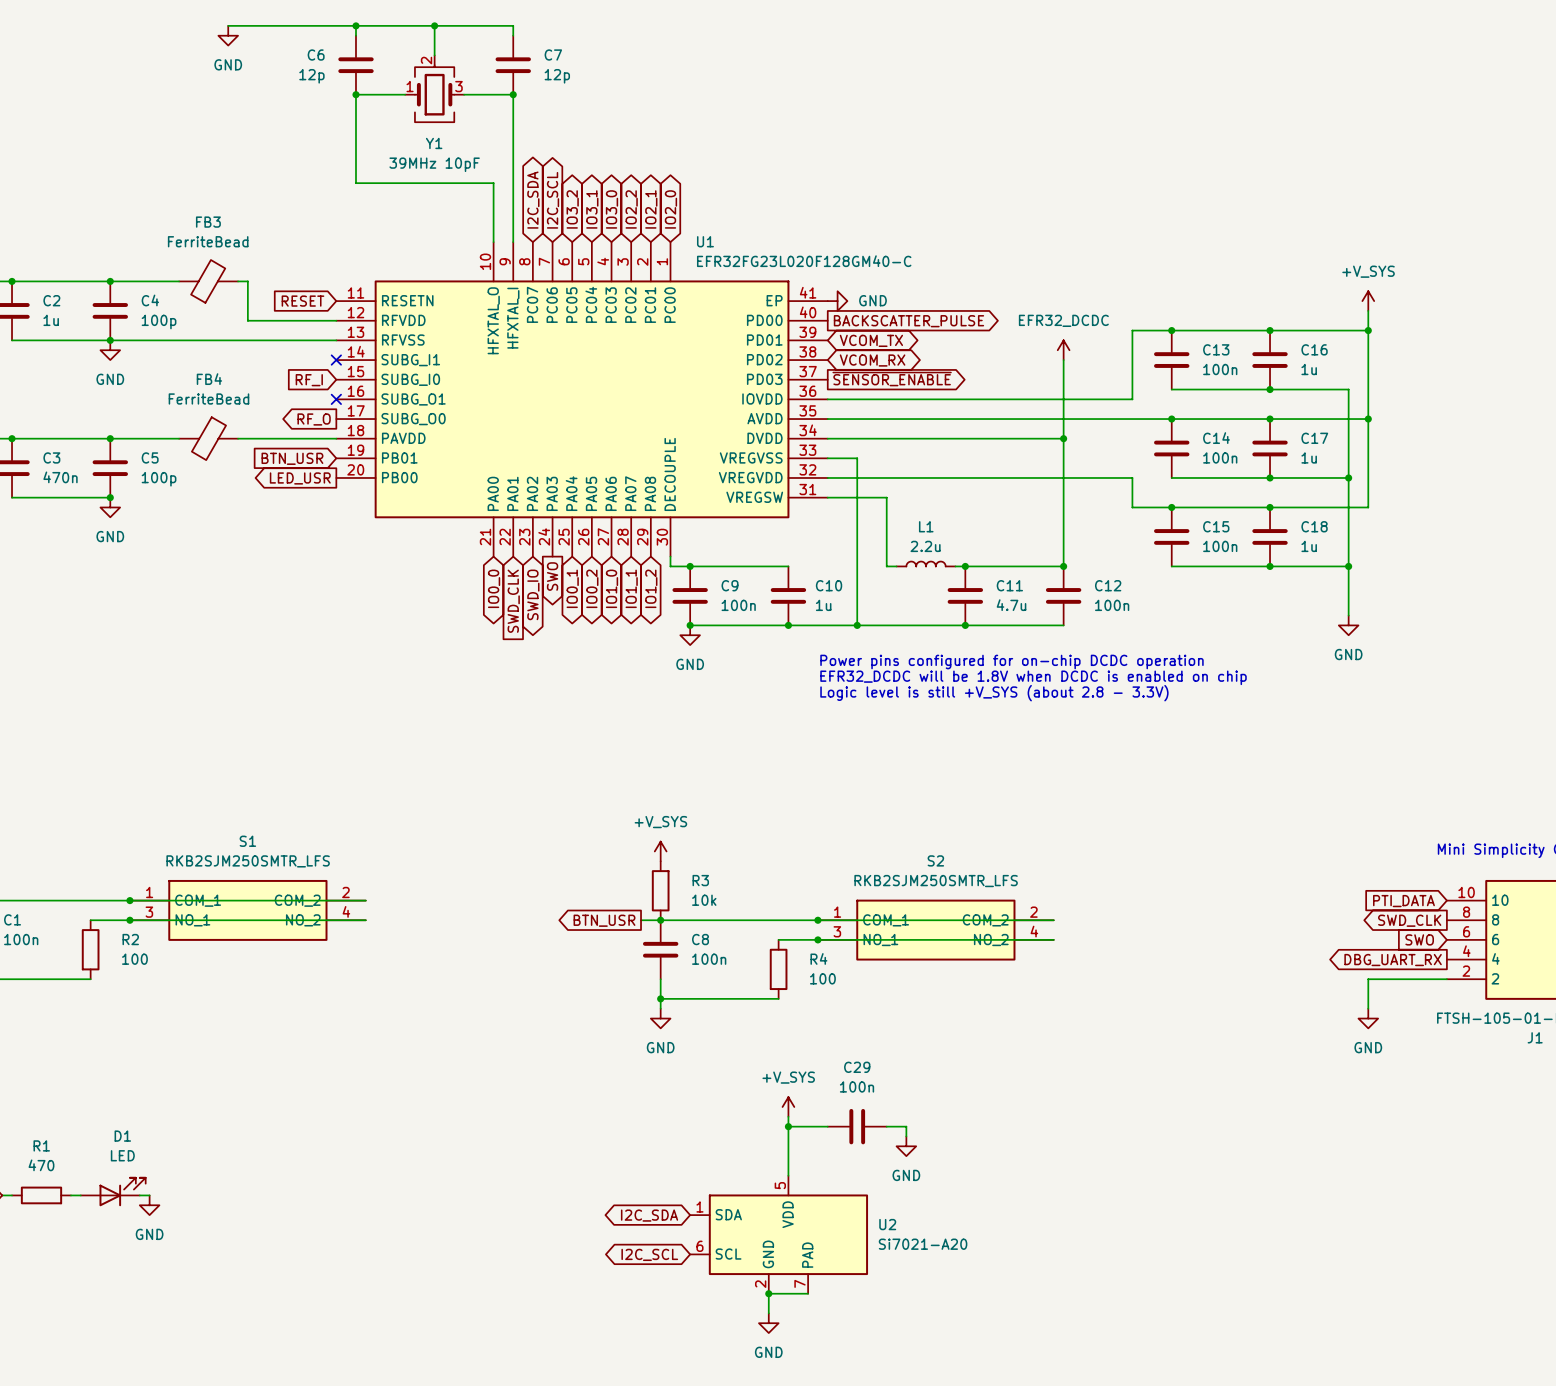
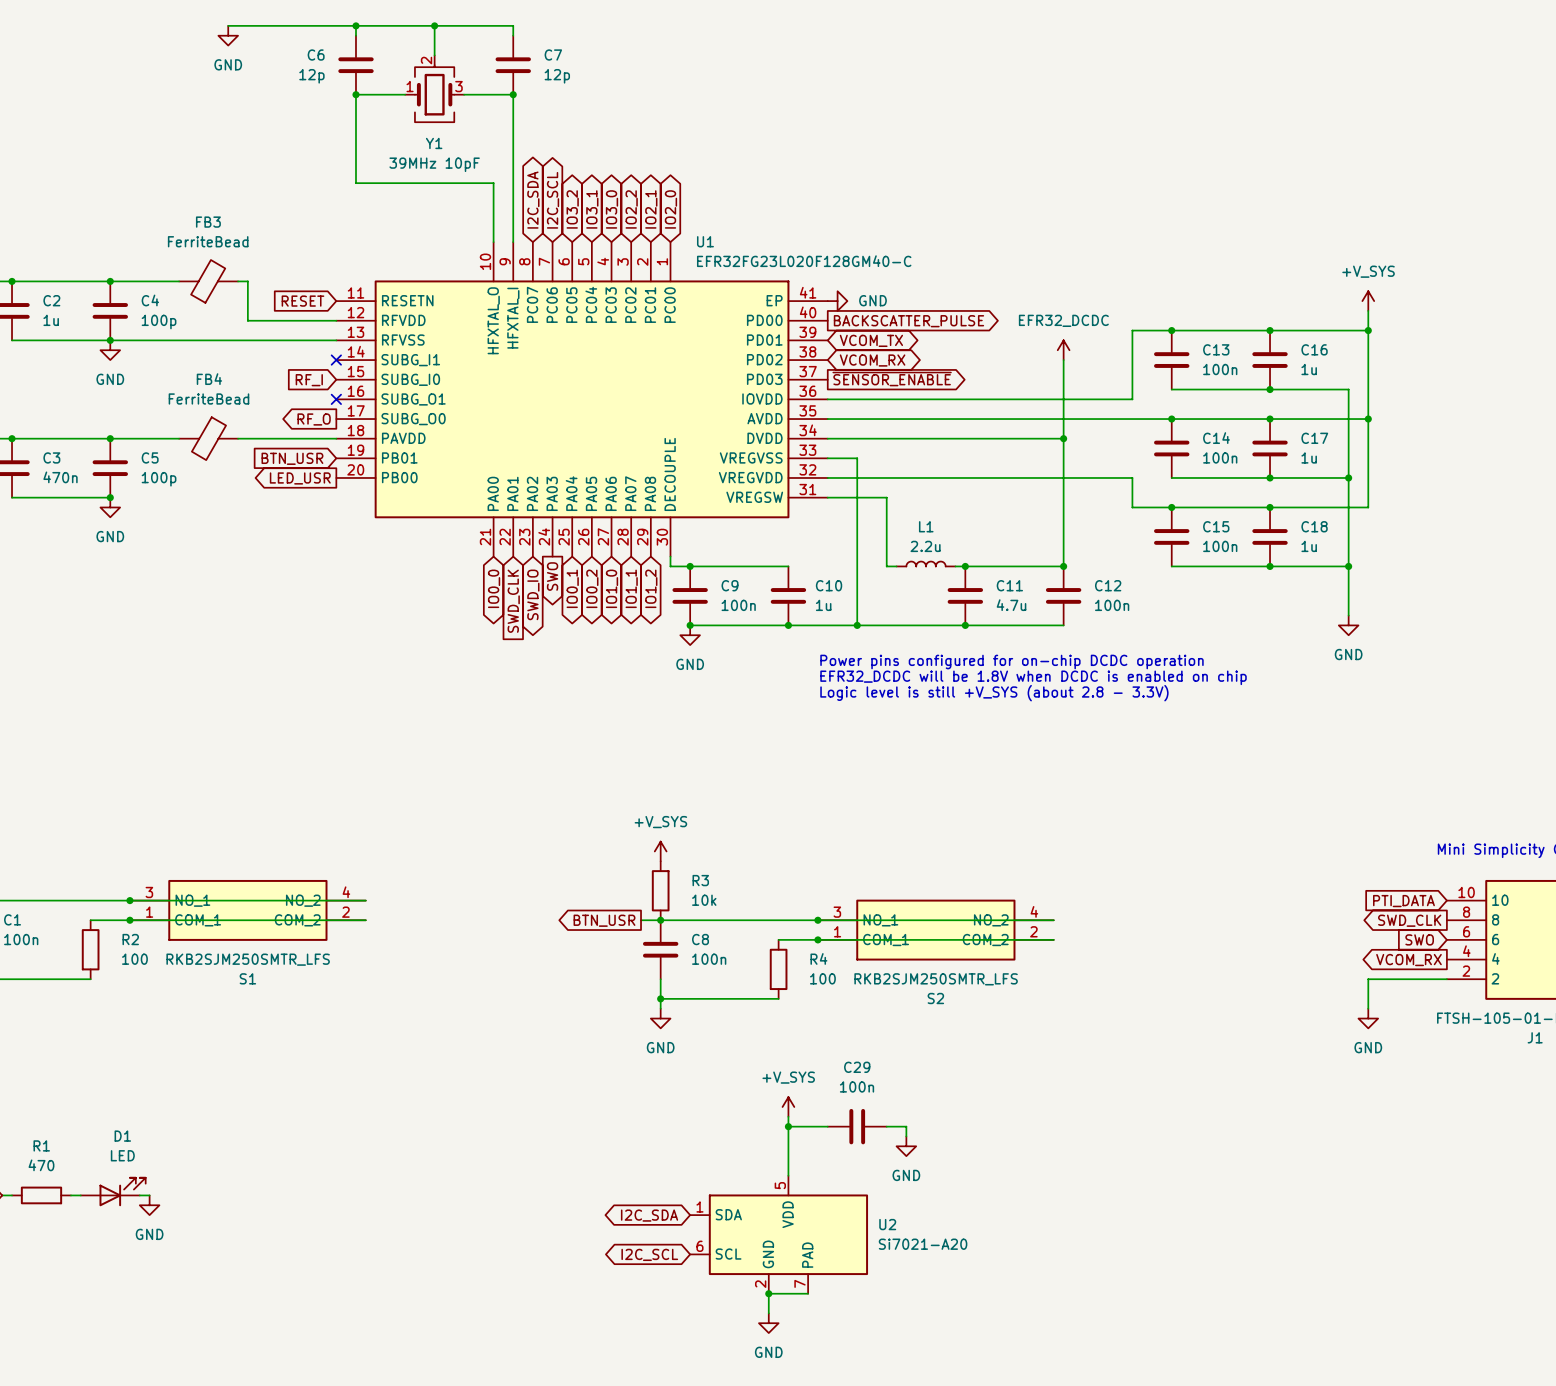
S1 flip: as is (247, 910) -> up-down (247, 910)
S2 flip: as is (935, 930) -> up-down (935, 930)
global label: DBG_UART_RX (1393, 960) -> VCOM_RX (1409, 960)

